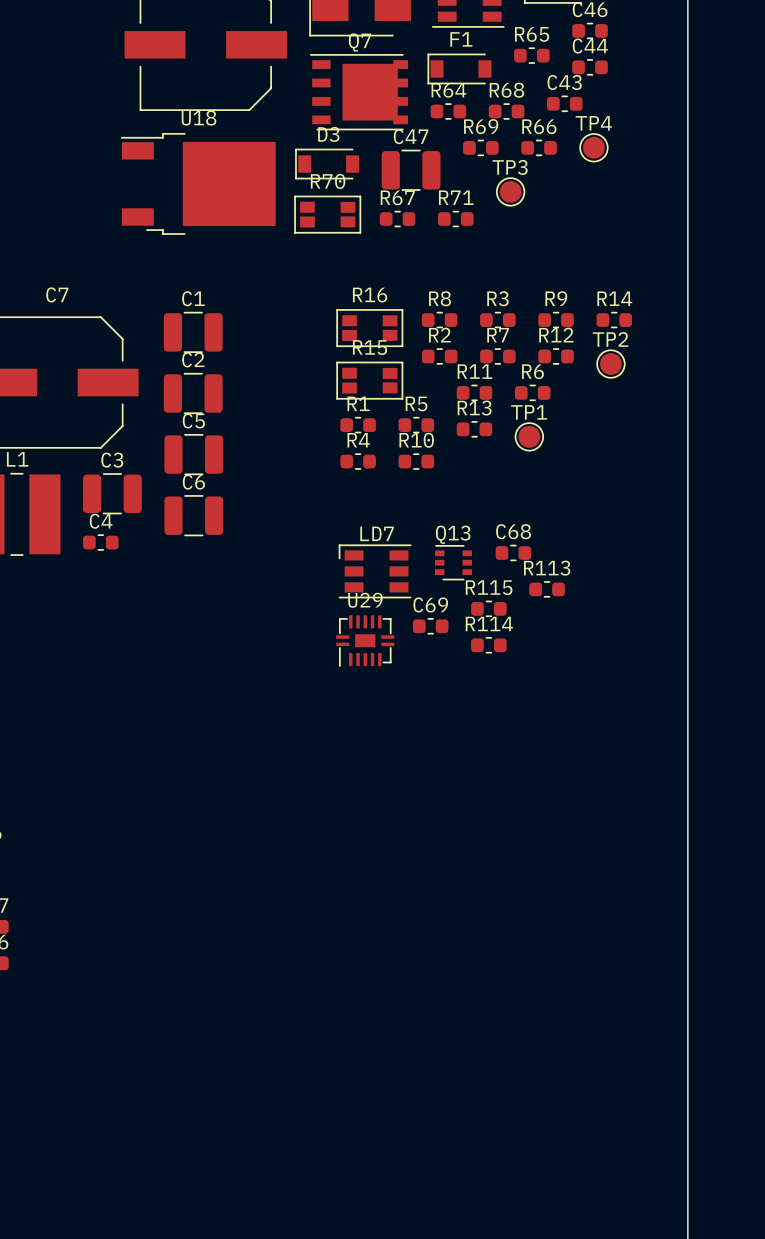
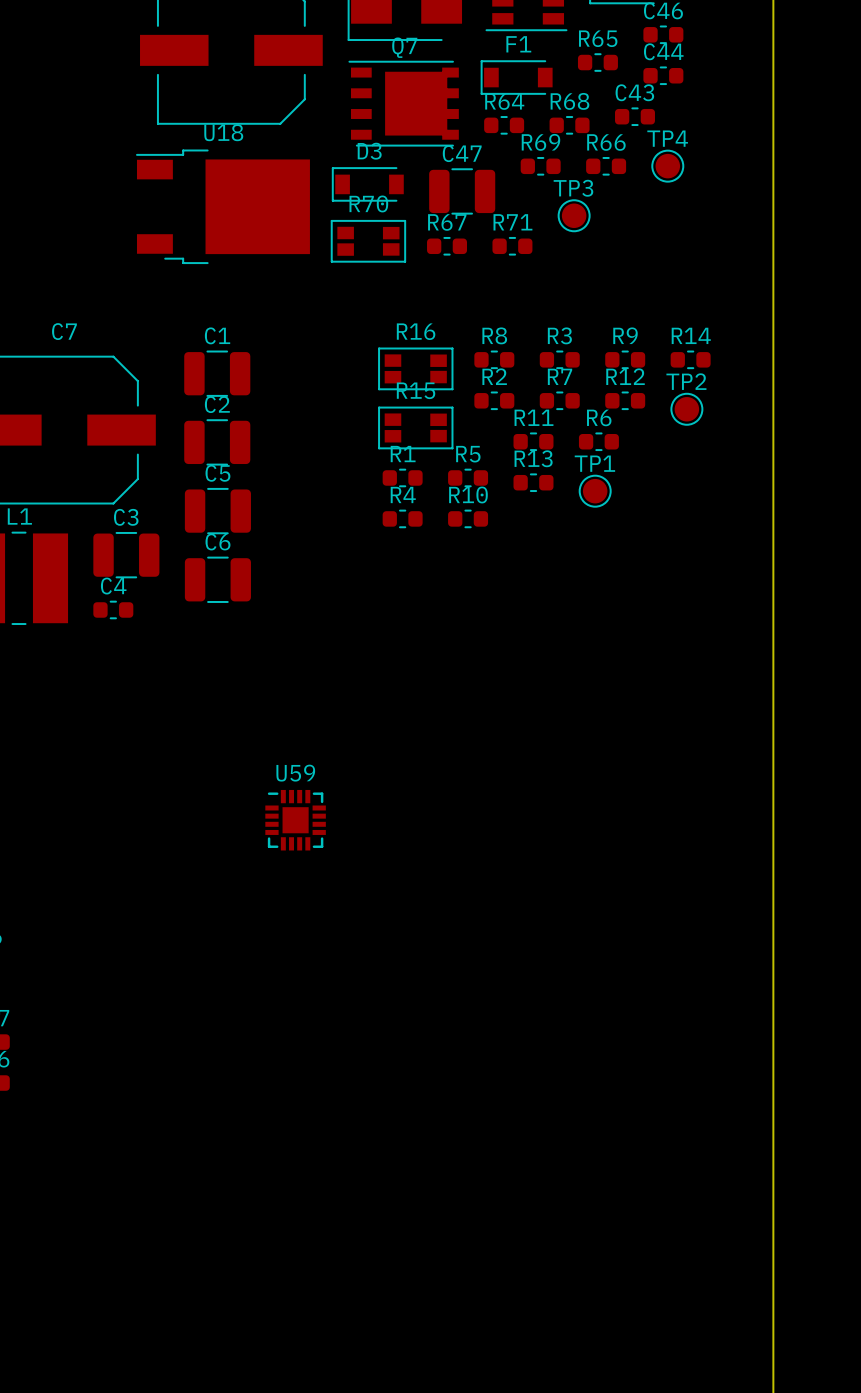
C68: (513, 552) -> none
Q13: (453, 562) -> none
LD7: (375, 571) -> none
R113: (547, 589) -> none
R115: (488, 608) -> none
C69: (430, 626) -> none
U29: (365, 641) -> none
R114: (488, 645) -> none
U59: none -> (295, 820)

